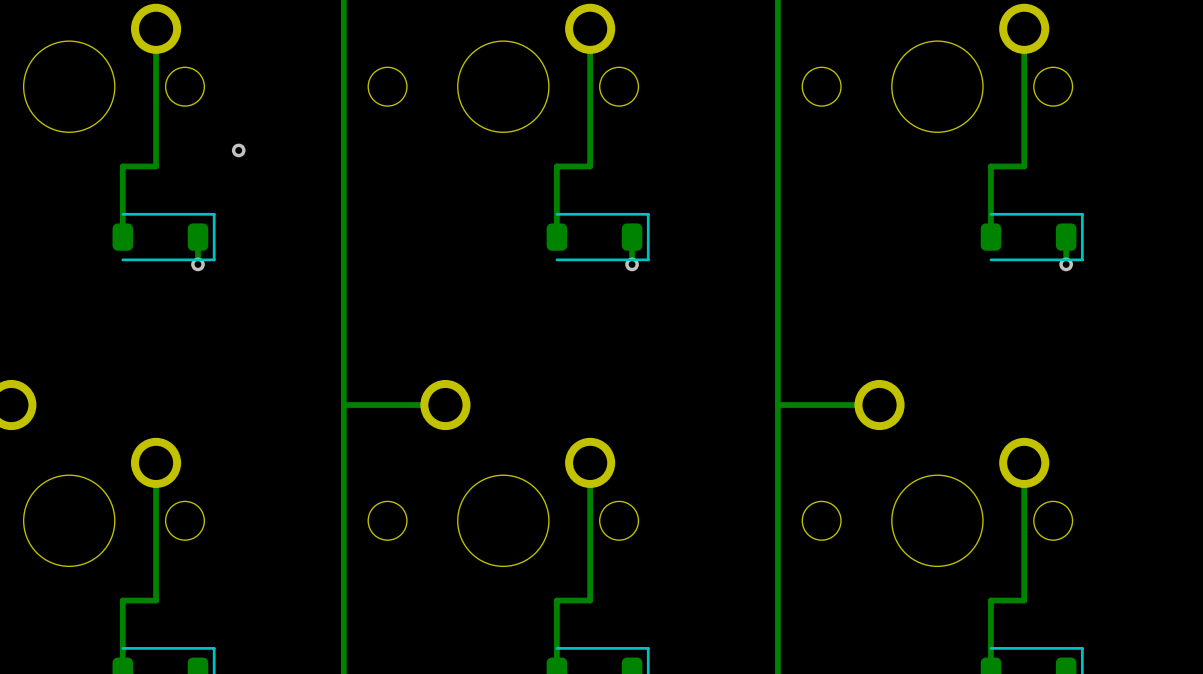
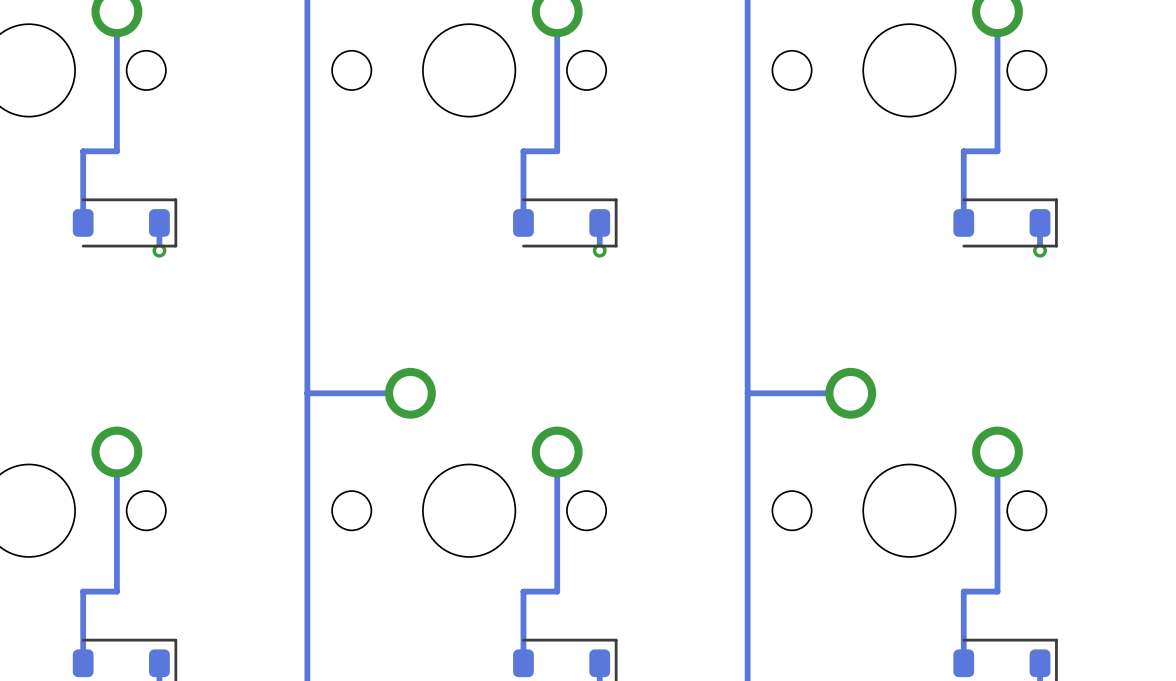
via: (238, 150) -> none

